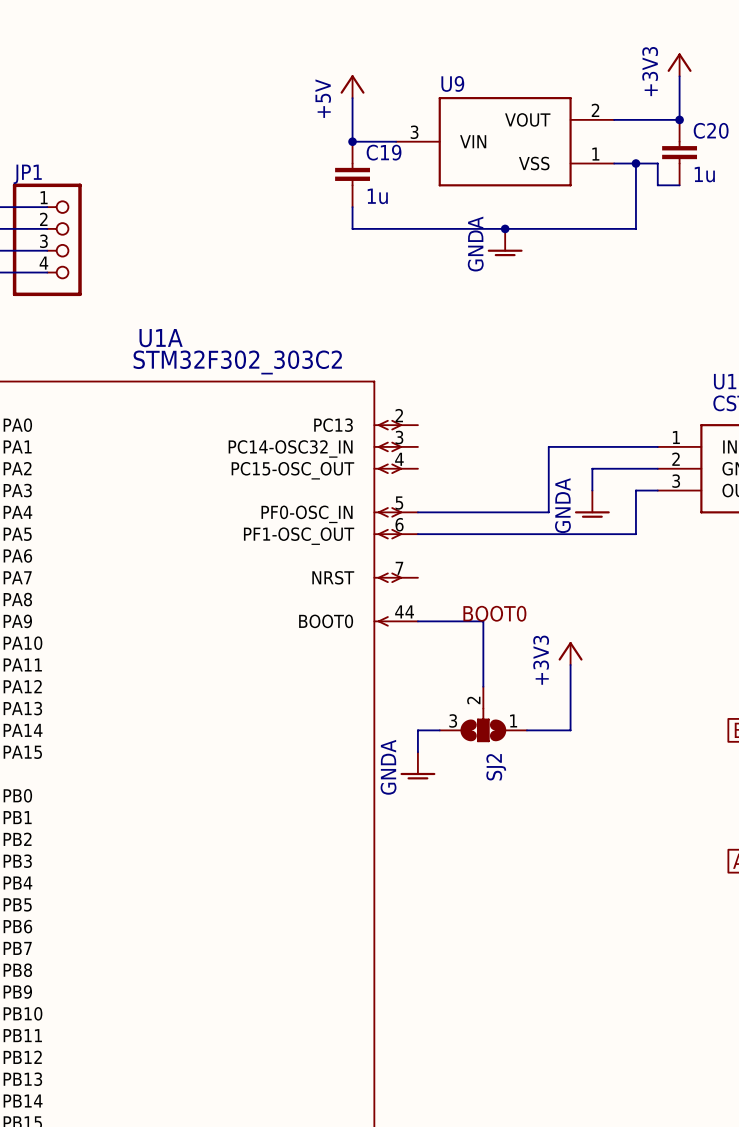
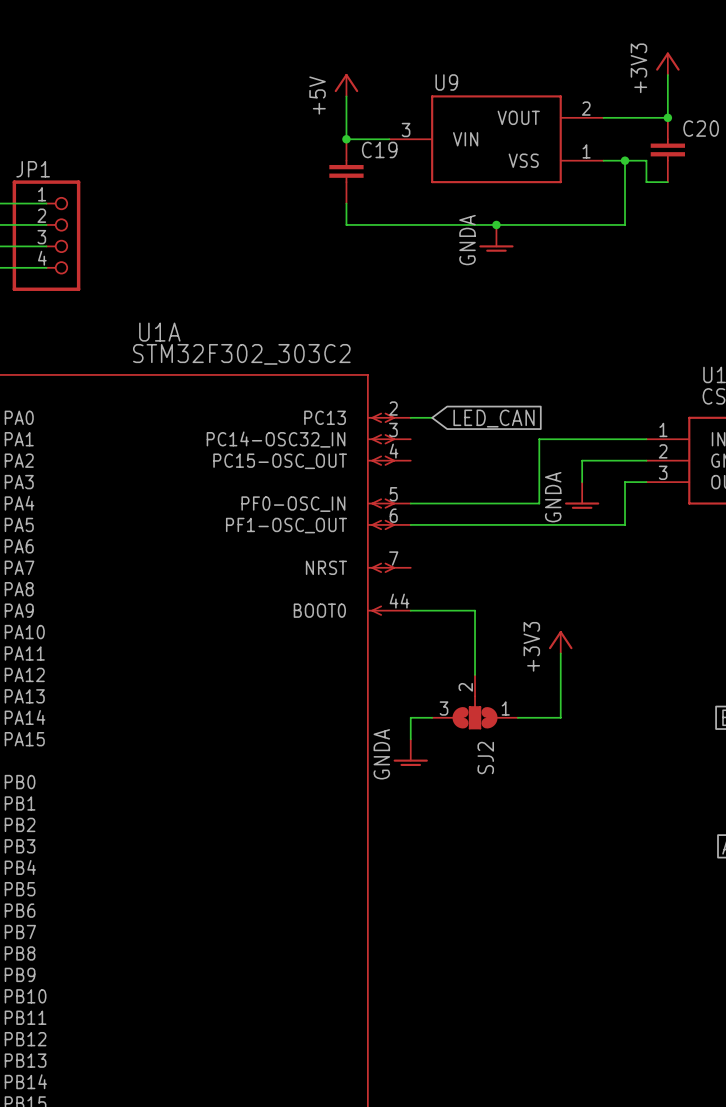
C20 value: 1u (704, 174) -> none
C19 value: 1u (377, 196) -> none
wire: none -> (410, 417) (432, 417)
global label: none -> LED_CAN (494, 418)
label: BOOT0 (494, 613) -> none

